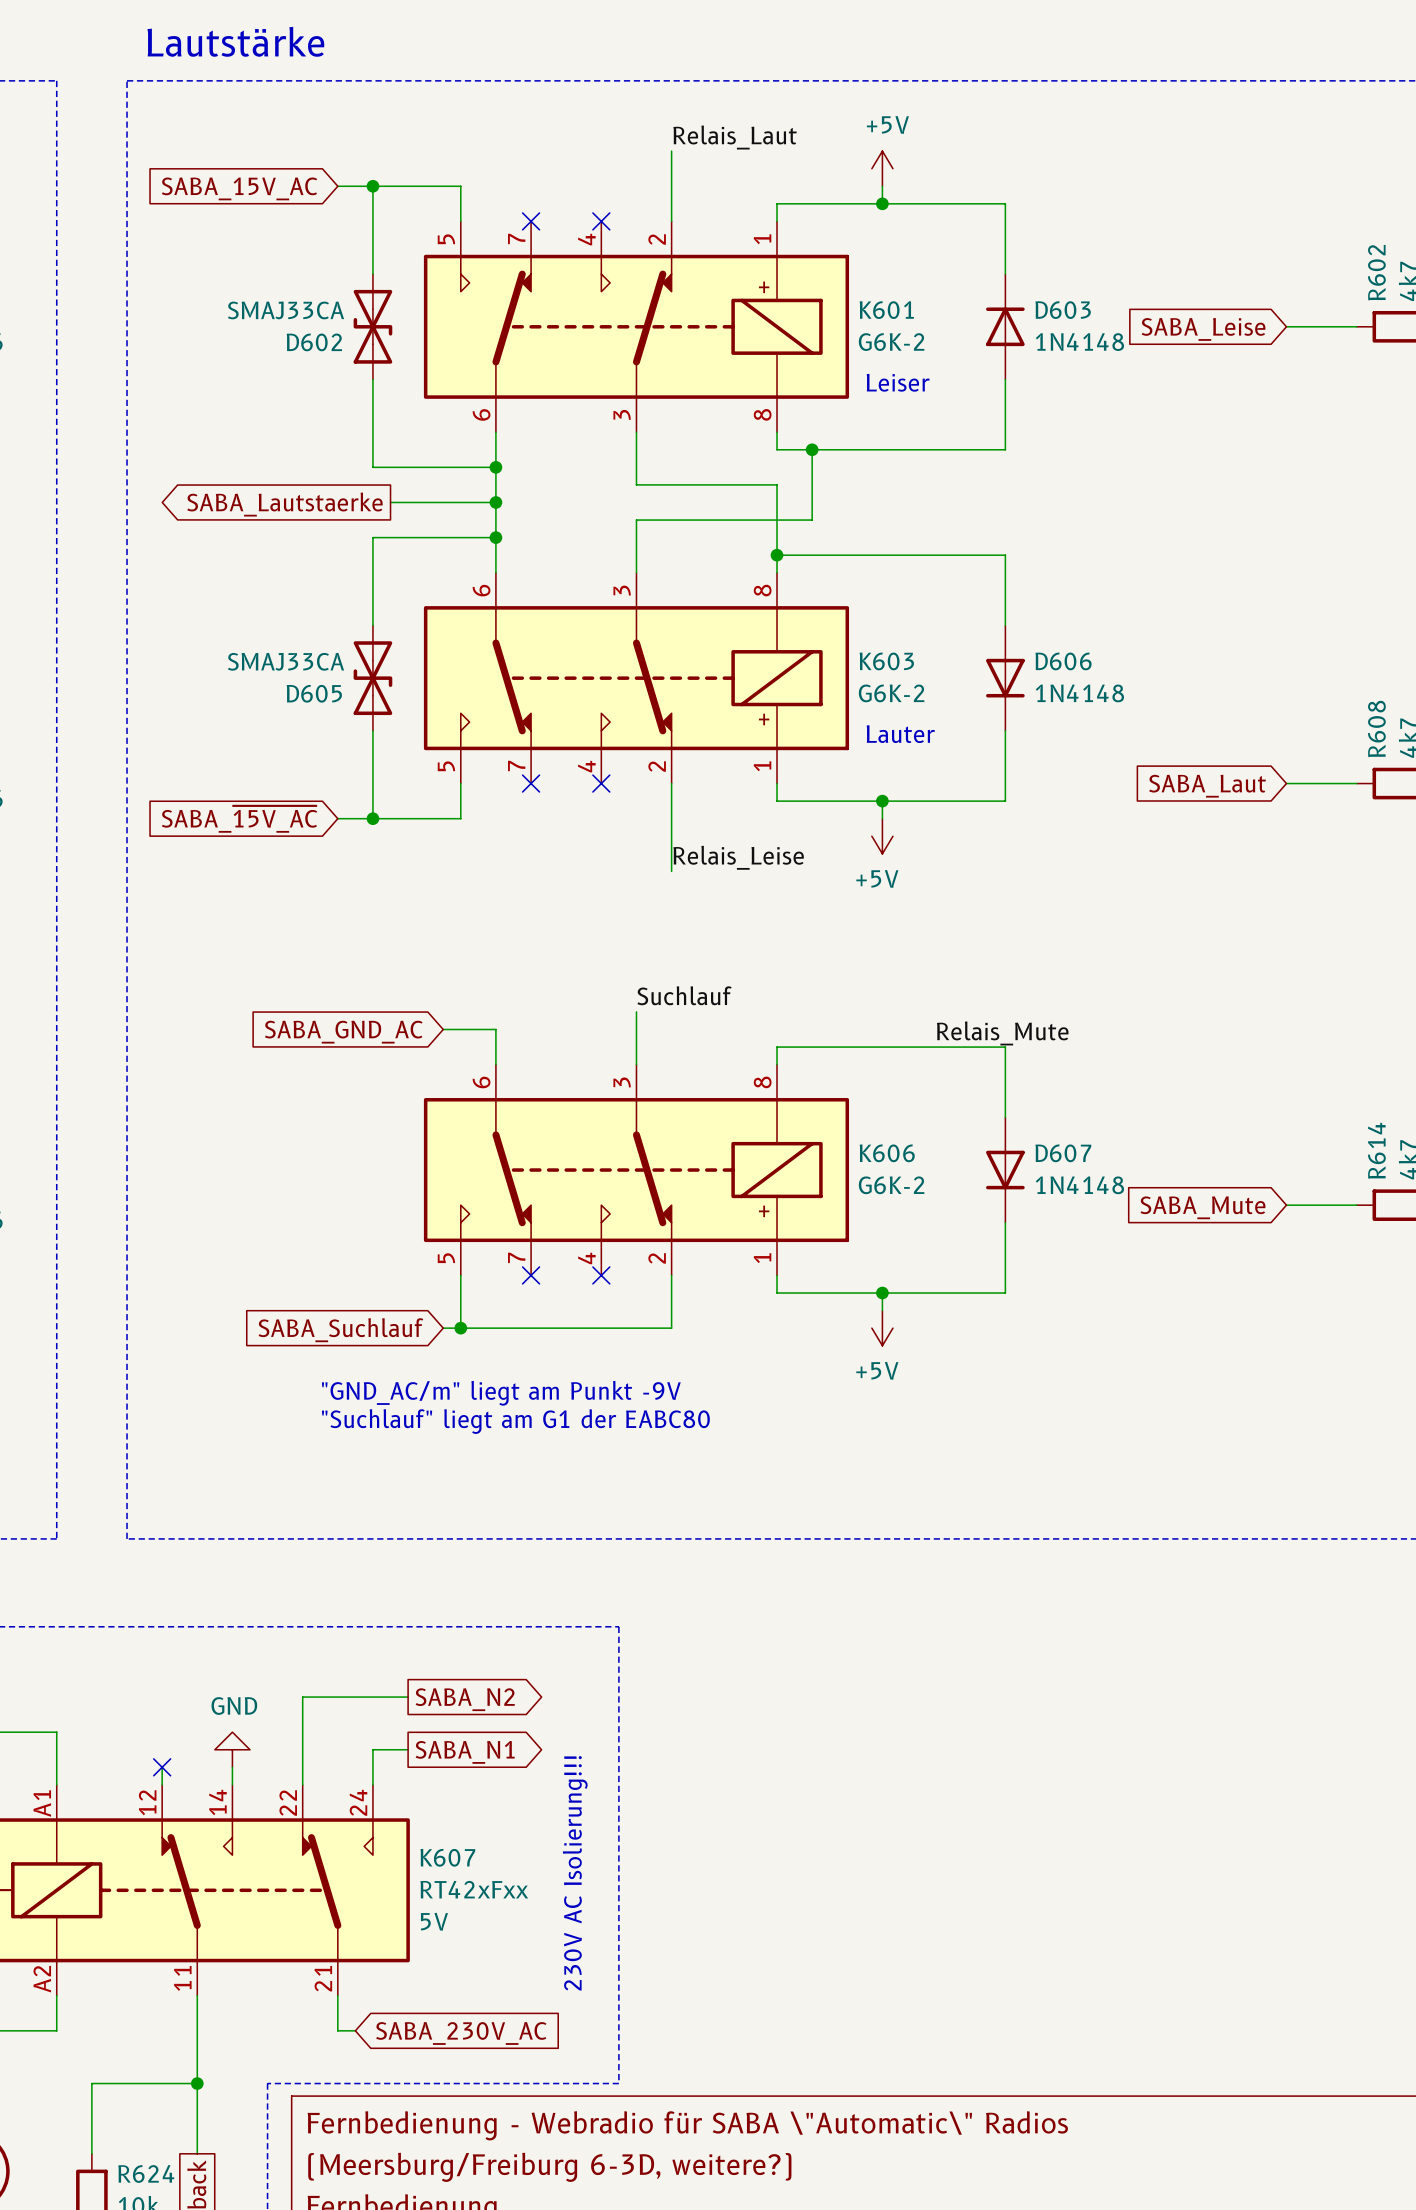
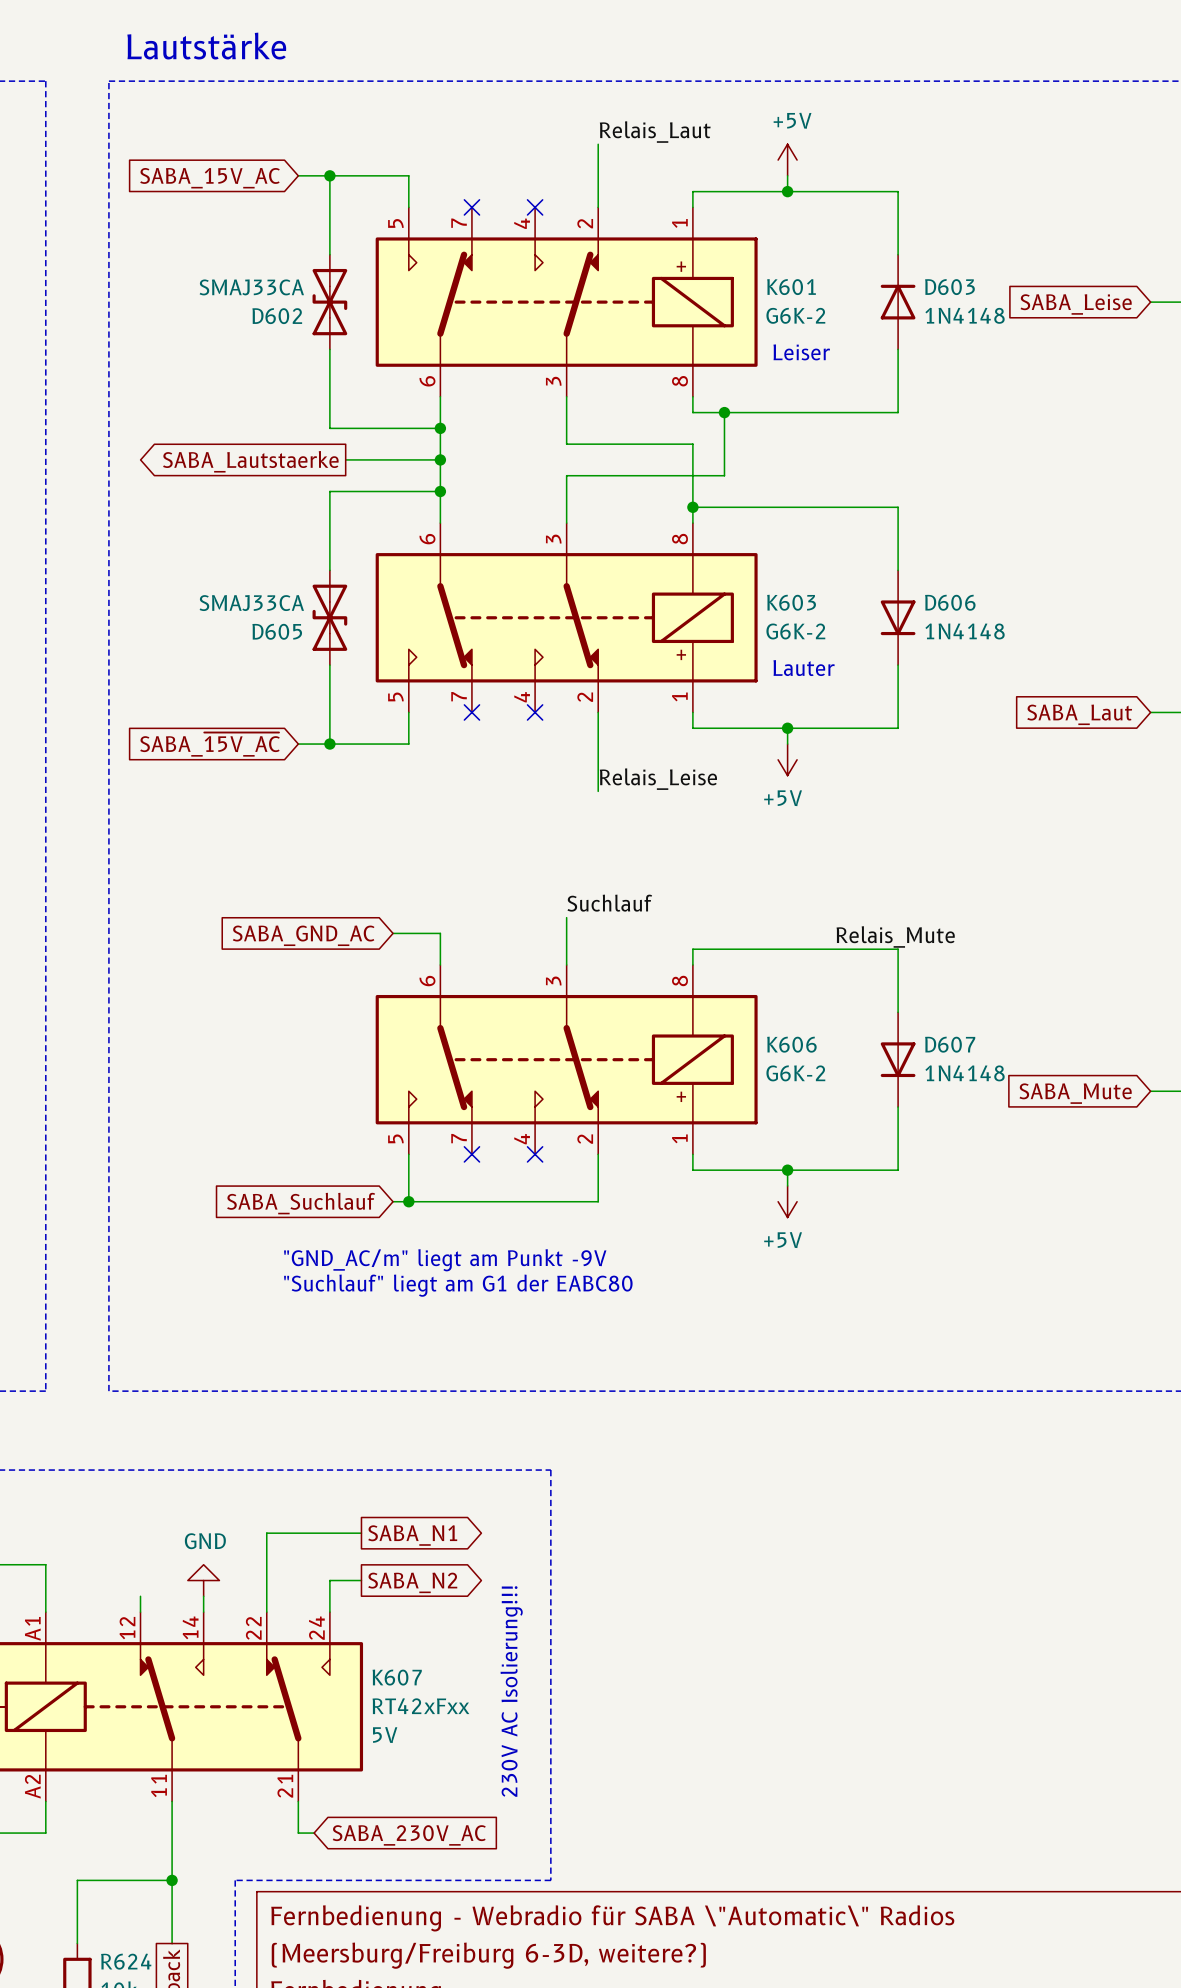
global label: SABA_N2 (465, 1699) -> SABA_N1 (412, 1535)
global label: SABA_N1 (465, 1752) -> SABA_N2 (412, 1582)
no-connect mark: (162, 1767) -> none

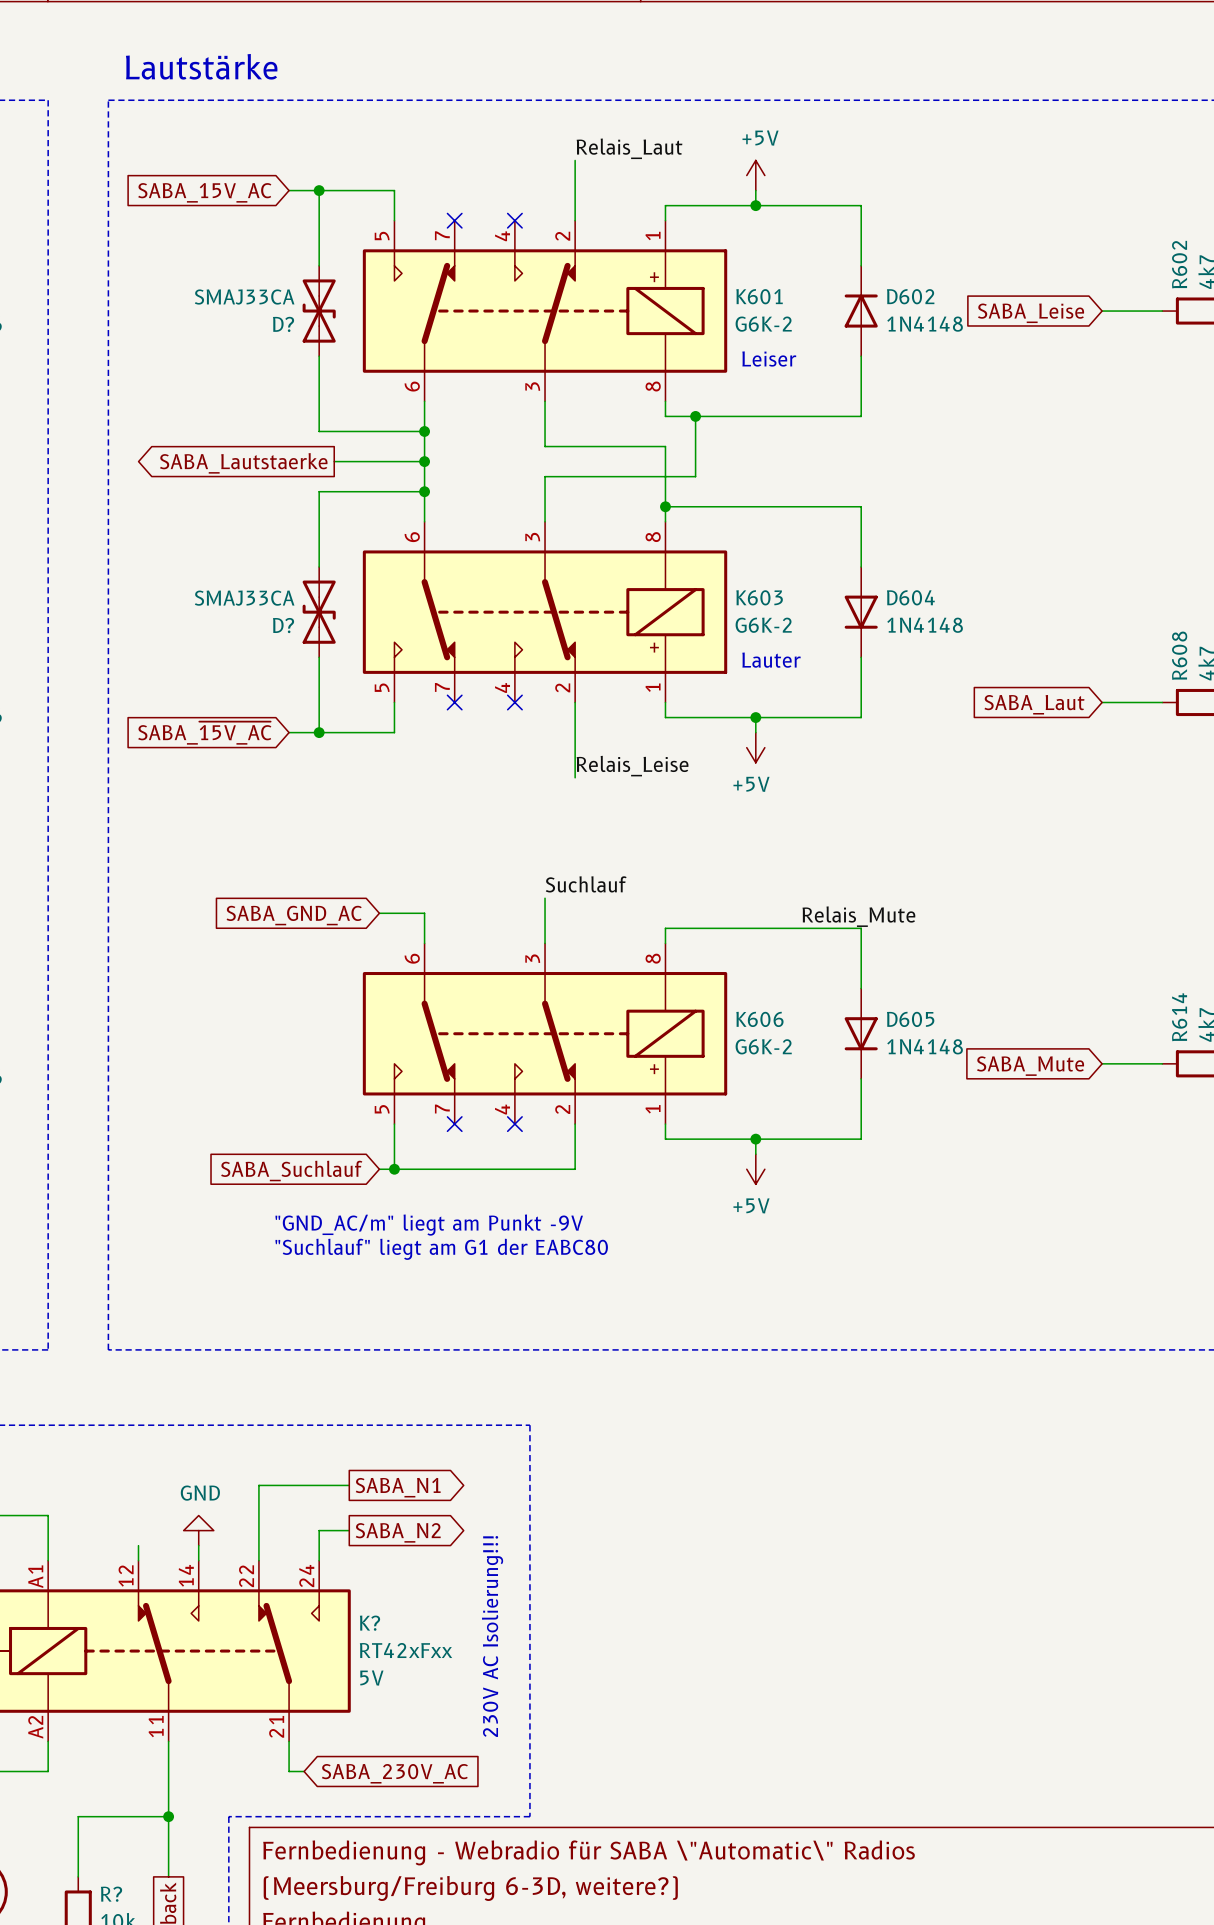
D603 name: D603 (949, 287) -> D602 (910, 296)
D602 name: D602 (277, 316) -> D? (283, 324)
D606 name: D606 (950, 602) -> D604 (910, 597)
D605 name: D605 (277, 631) -> D? (283, 625)
D607 name: D607 (950, 1044) -> D605 (910, 1019)
K607 name: K607 (397, 1677) -> K? (370, 1623)
R624 name: R624 (126, 1961) -> R? (111, 1894)

